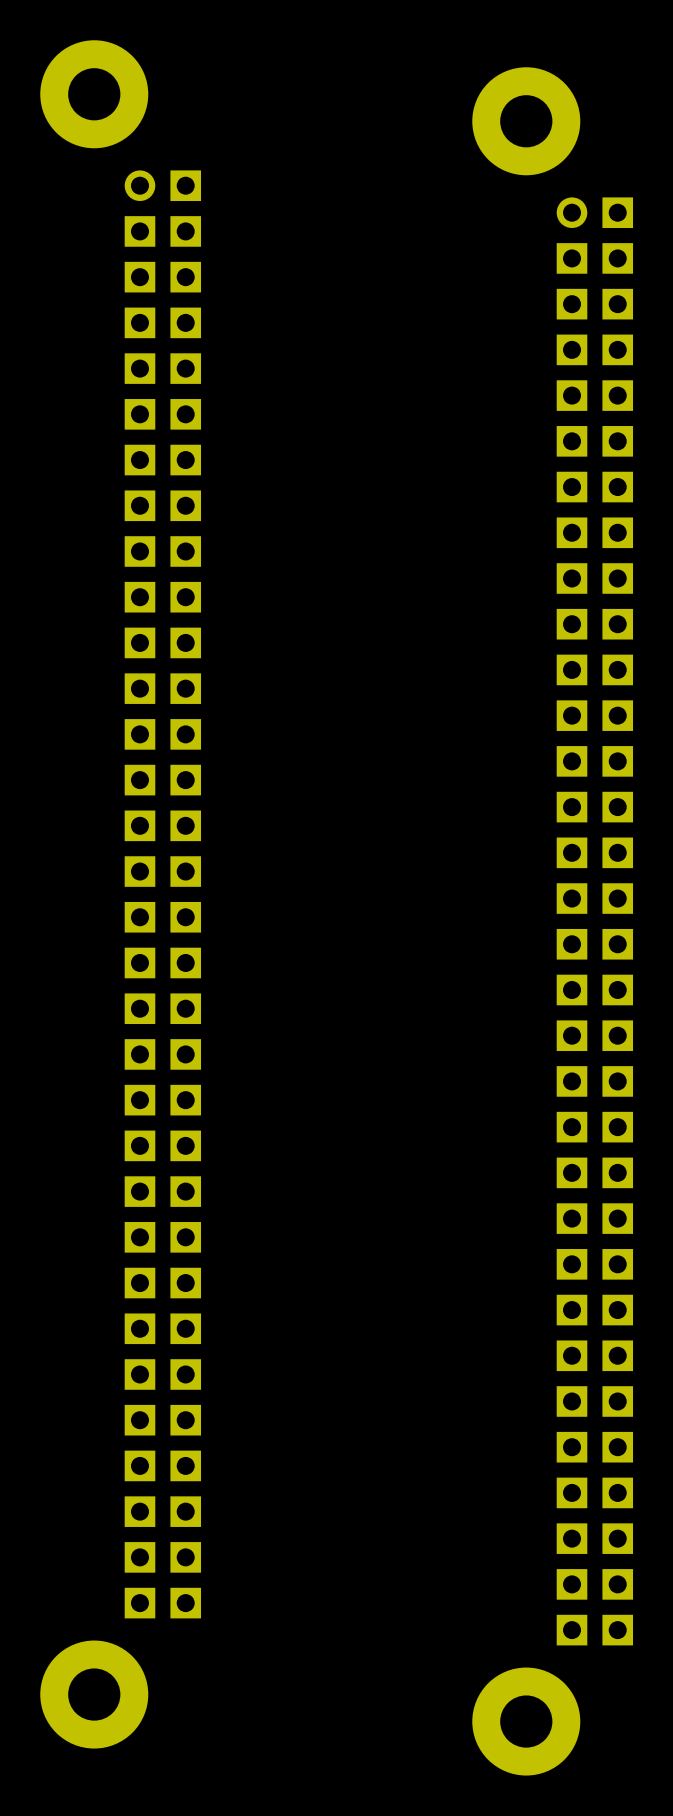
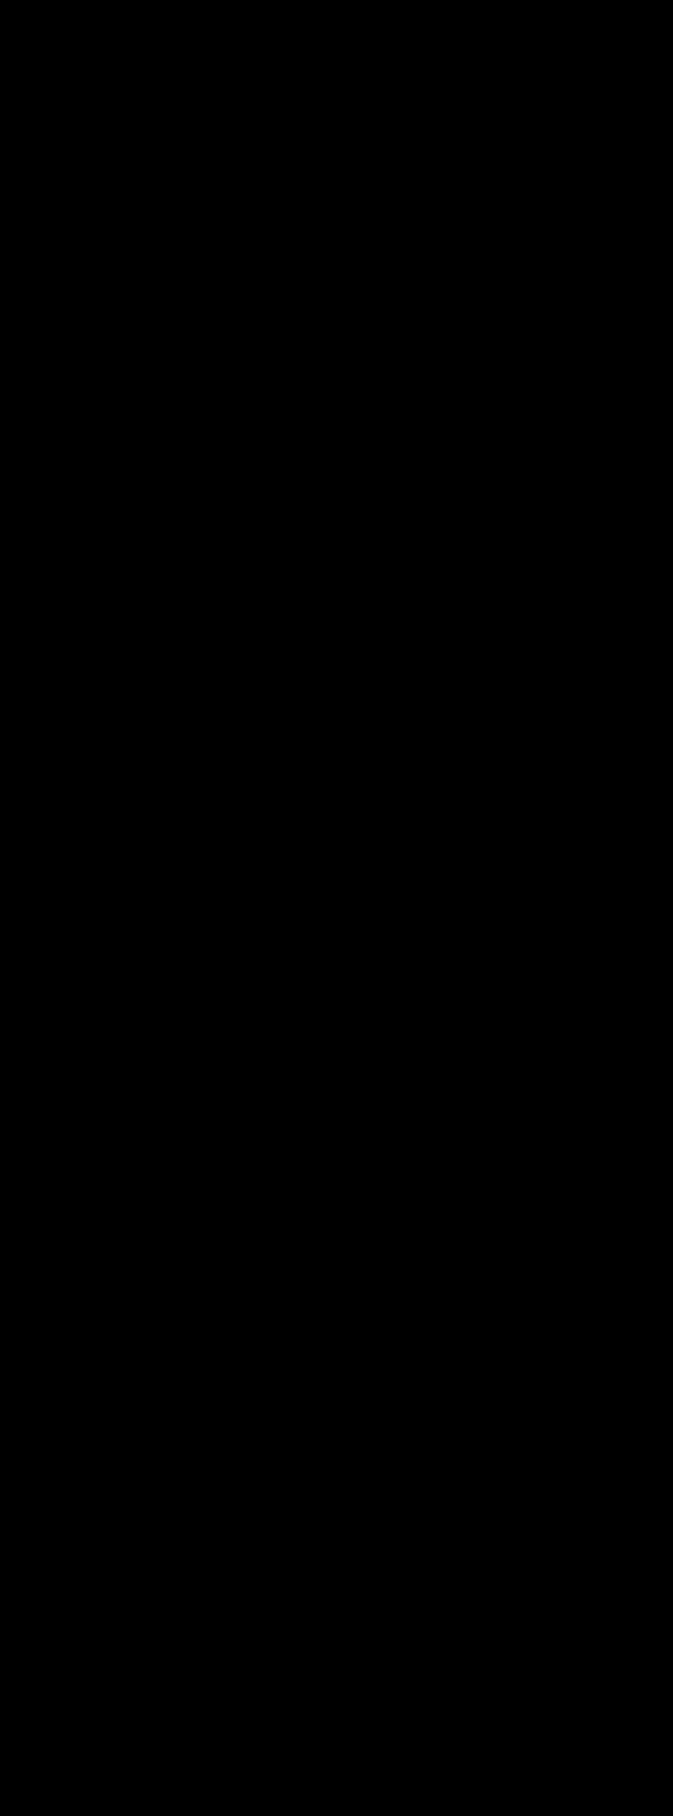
part: (120, 894) -> none
part: (552, 921) -> none

